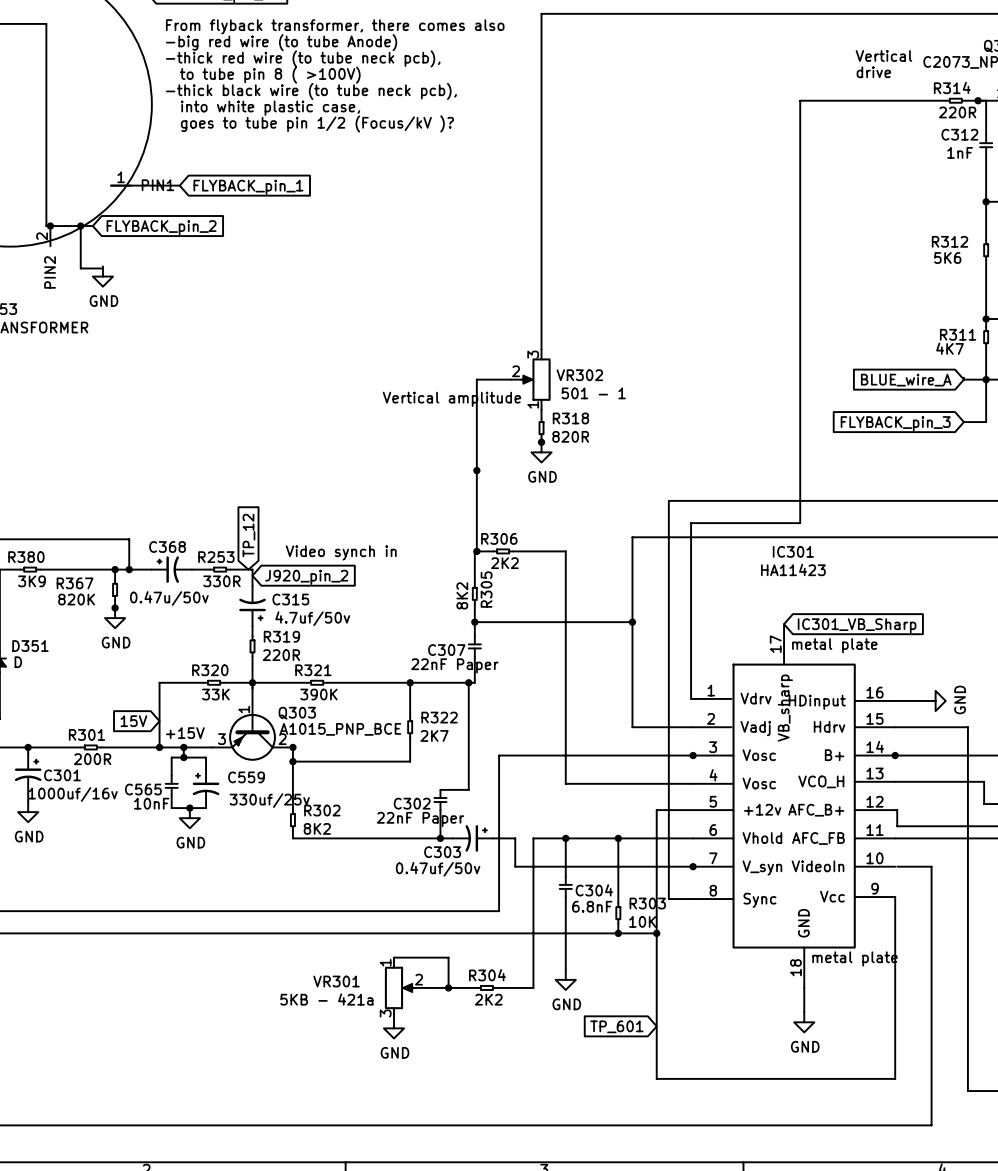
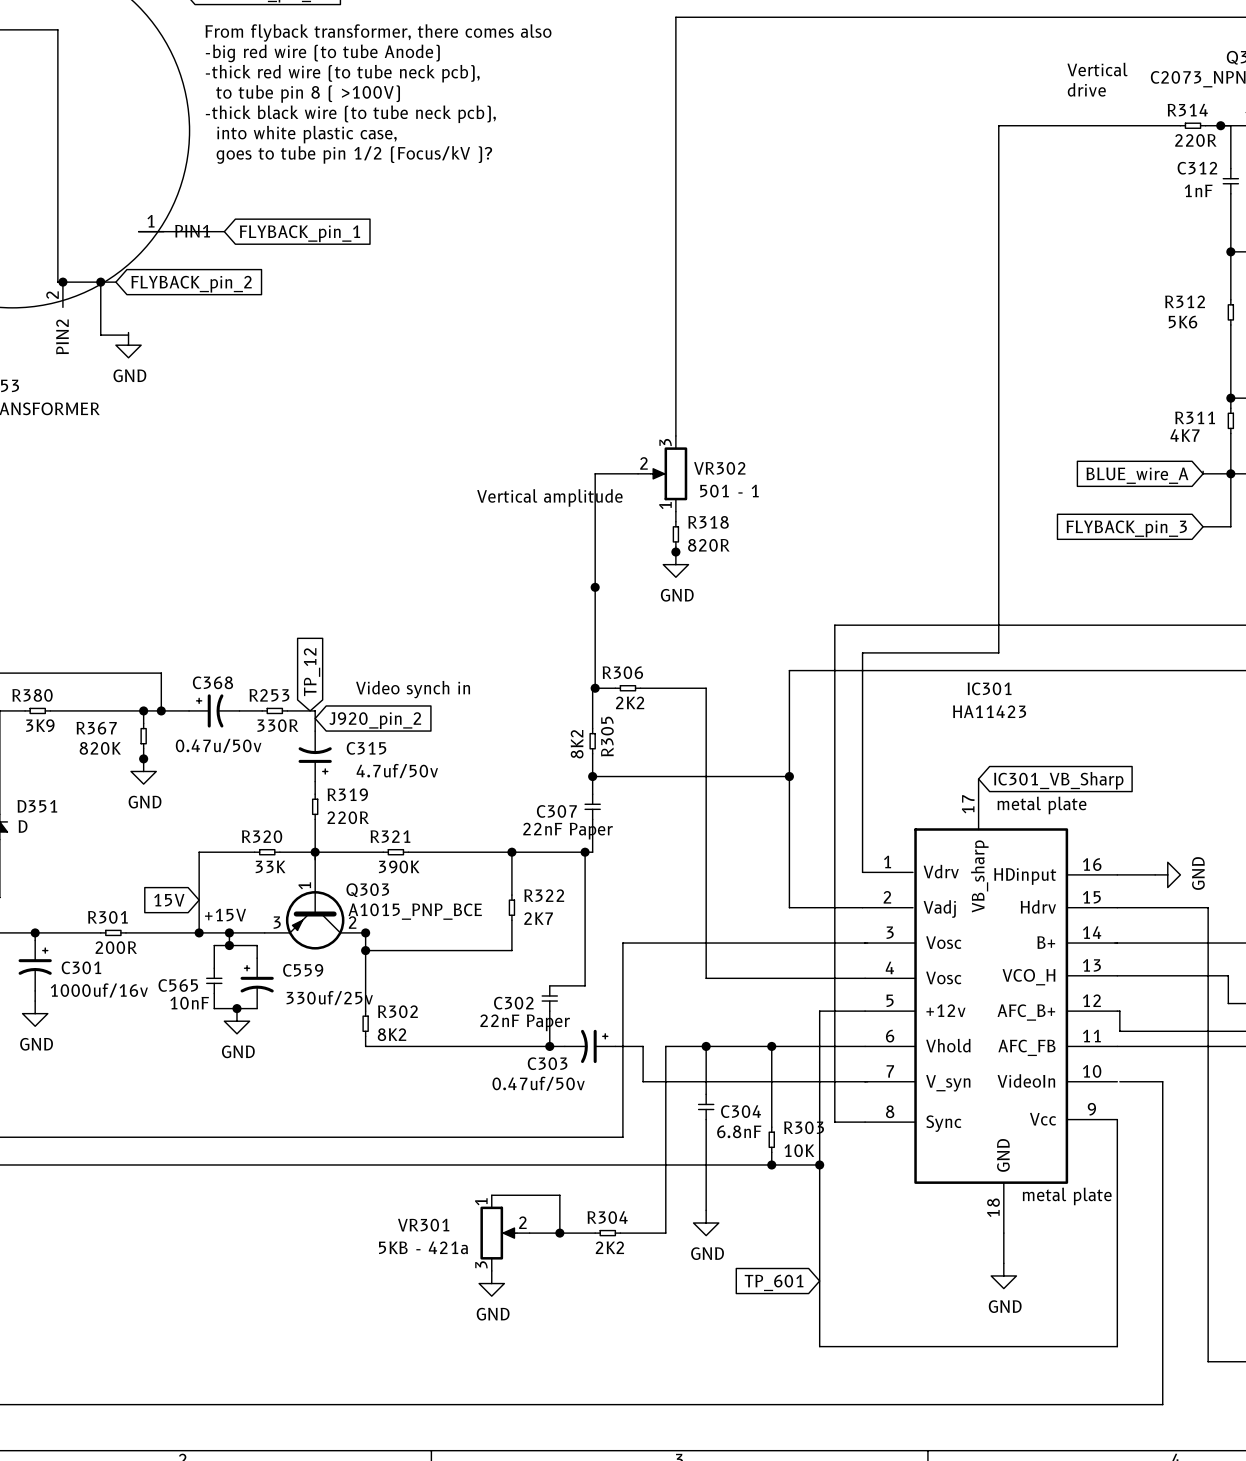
junction: (693, 755) -> none
junction: (895, 755) -> none
junction: (693, 866) -> none

